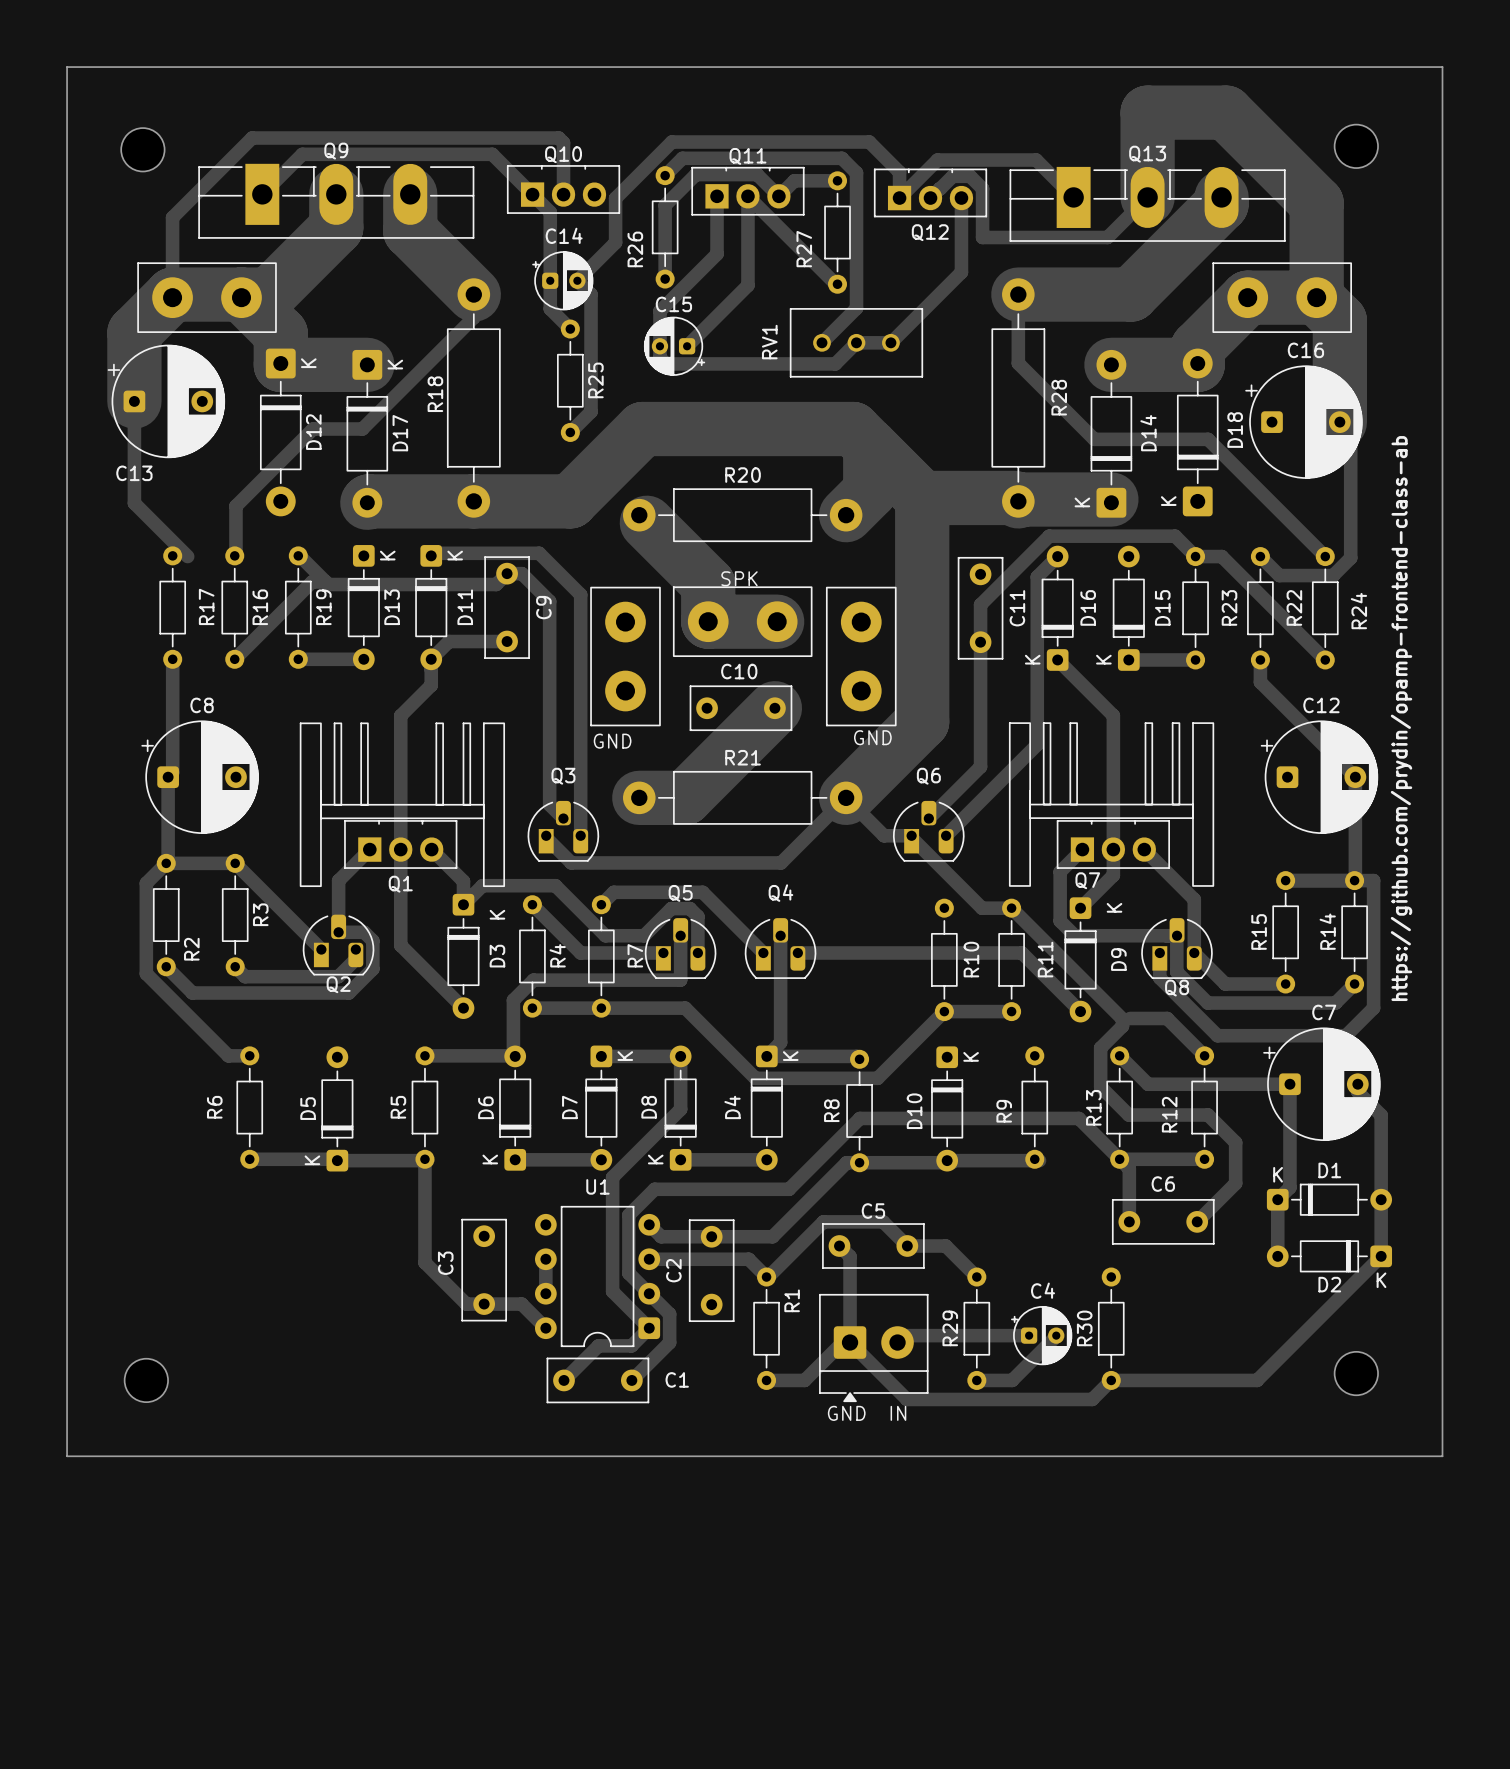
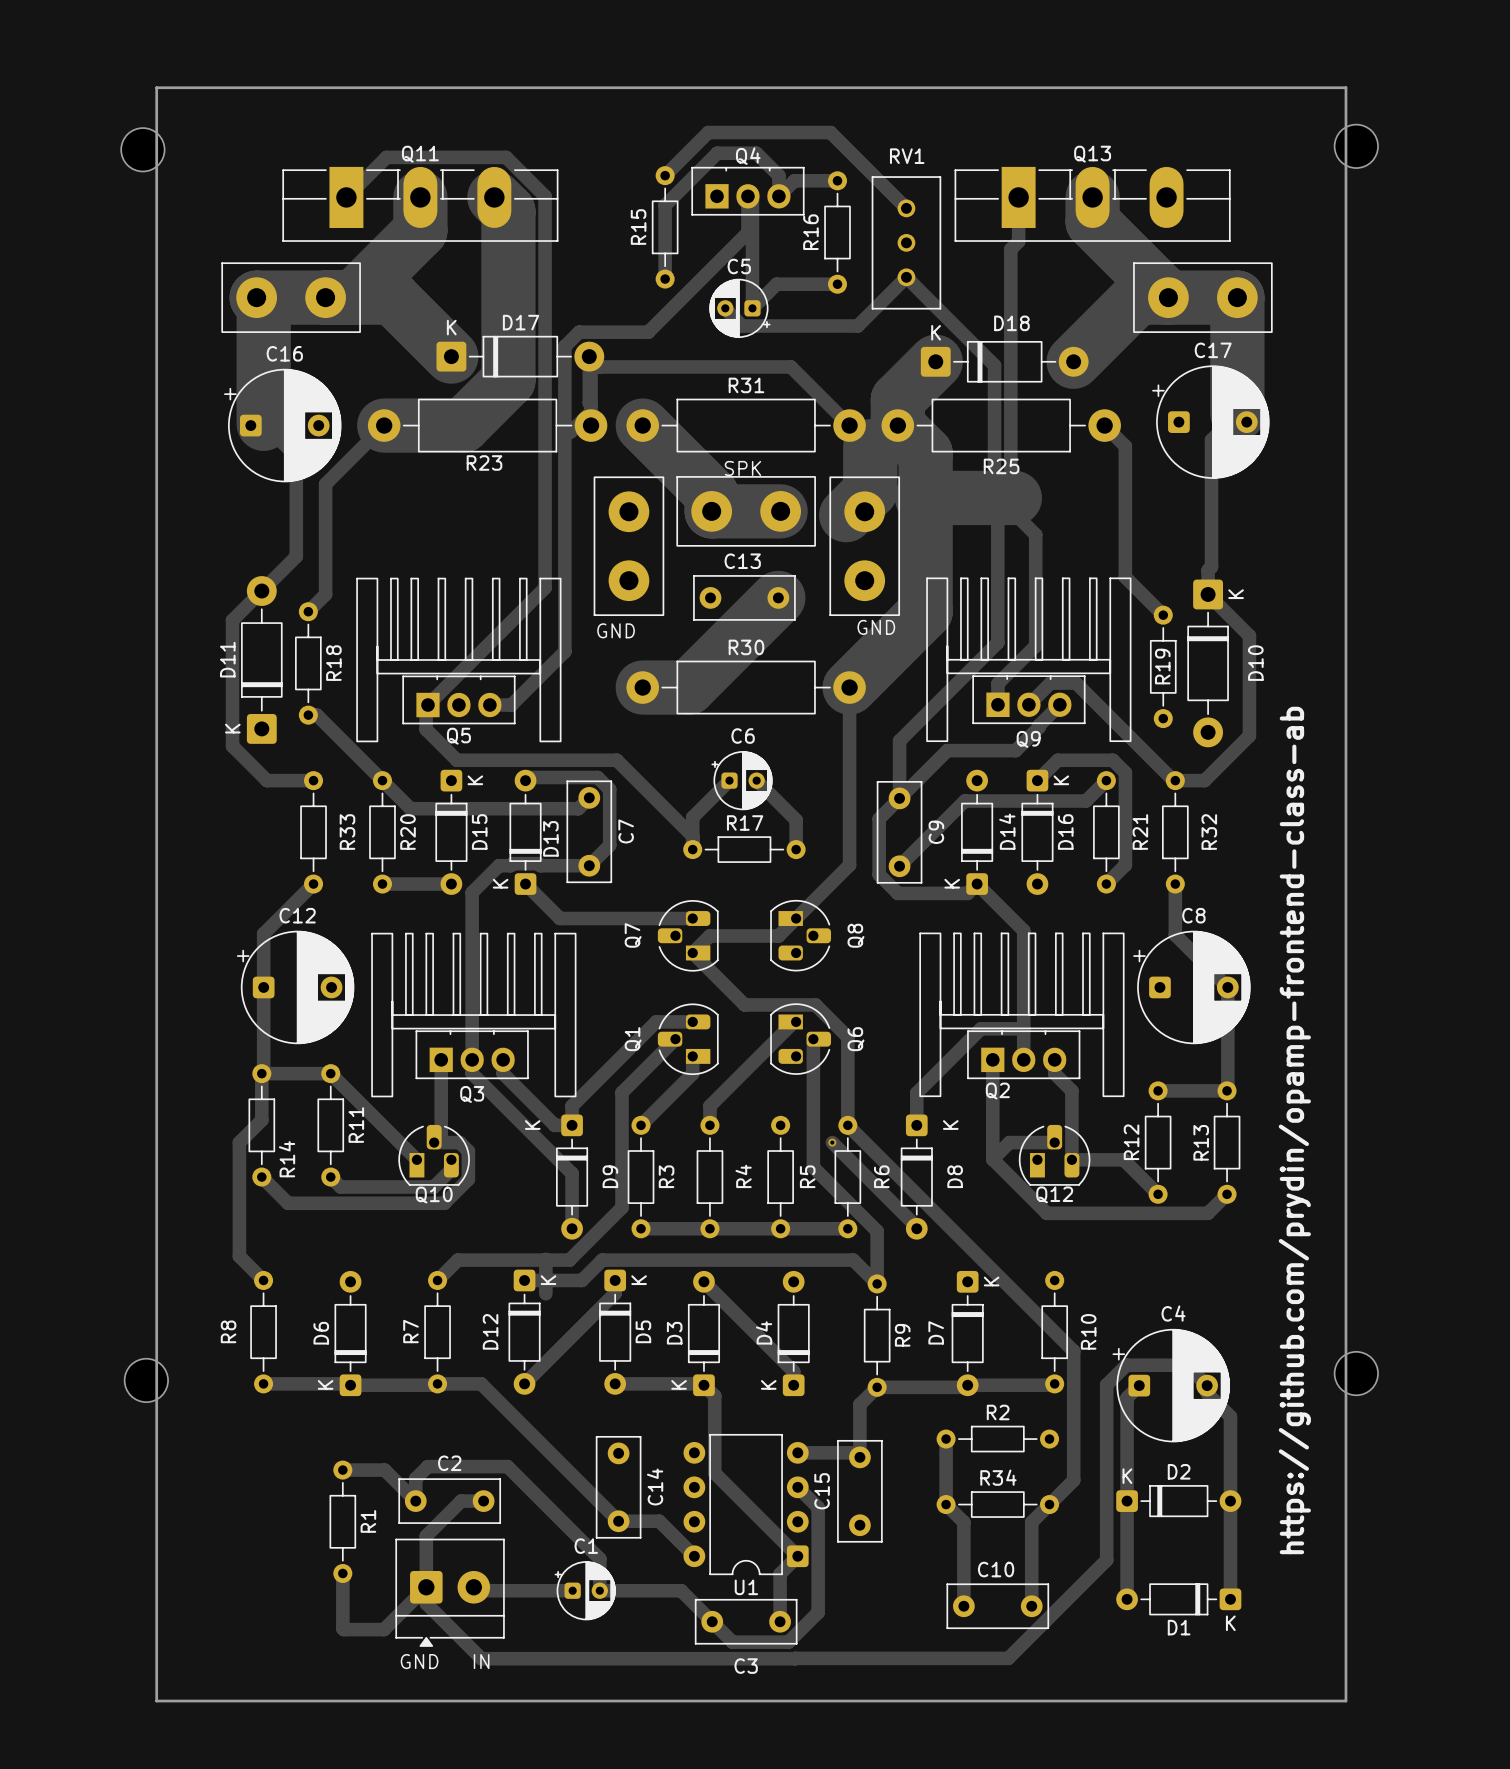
board edge: (67, 67) (1442, 67) (1442, 1456) (67, 1456) (67, 67) -> (156, 87) (156, 1701) (1345, 1701) (1345, 87) (156, 87)
Q9 name position: Q9 (336, 151) -> Q9 (1028, 739)
Q10 name position: Q10 (563, 154) -> Q10 (434, 1195)
Q11 name: Q11 (747, 156) -> Q4 (748, 156)
track: (682, 158) (841, 158) (856, 172) (856, 308) (821, 342) -> (682, 158) (708, 132) (830, 132) (906, 208)
Q9 footprint: [198, 163, 475, 239] -> [972, 675, 1086, 725]
Q10 footprint: [506, 165, 621, 214] -> [398, 1124, 470, 1186]
Q12 footprint: [873, 168, 988, 218] -> [1018, 1124, 1091, 1186]
track: (695, 174) (757, 174) (778, 196) -> (695, 174) (717, 153) (756, 153) (778, 175) (778, 196)
track: (262, 194) (302, 154) (492, 154) (550, 212) (550, 308) (570, 329) -> none
track: (336, 194) (336, 227) (269, 294) (172, 294) -> none
track: (410, 194) (410, 231) (473, 294) (473, 317) (362, 429) (313, 429) (235, 506) (235, 554) -> none
track: (563, 194) (563, 142) (558, 138) (252, 138) (172, 217) (172, 294) -> none
track: (717, 196) (717, 254) (659, 311) (659, 357) (666, 363) (835, 363) (856, 342) (890, 342) (961, 272) (961, 198) -> none
track: none -> (346, 197) (386, 157) (506, 157) (545, 196) (545, 587) (426, 706) (426, 729) (456, 760) (616, 760) (692, 836)
track: none -> (420, 197) (420, 230) (353, 297)
track: none -> (494, 197) (508, 211) (508, 380) (463, 425) (384, 425) (325, 484) (325, 594) (308, 611)
track: none -> (1018, 197) (1018, 241) (1010, 249) (1010, 509) (1035, 534) (1035, 645) (997, 683) (997, 704)
track: (1073, 197) (1036, 160) (937, 160) (899, 198) (899, 172) (869, 142) (671, 142) (615, 198) (615, 242) (577, 280) (591, 294) (591, 358) -> none
track: none -> (1092, 197) (1092, 221) (1168, 297)
track: (1221, 197) (1221, 204) (1131, 294) (1018, 294) (1018, 363) (1094, 439) (1208, 439) (1325, 556) -> none
track: (930, 198) (952, 176) (970, 176) (982, 188) (982, 237) (1107, 237) (1147, 197) (1147, 112) (1226, 112) (1316, 203) (1316, 297) -> none
track: (752, 200) (835, 284) -> (752, 200) (752, 308) (776, 284) (837, 284)
Q11: none -> (420, 204)
Q13 position: (1147, 204) -> (1092, 204)
track: (747, 232) (747, 285) (687, 346) -> (747, 232) (648, 332) (579, 332) (564, 346) (564, 651) (511, 705) (489, 705)
C14 name position: C14 (564, 235) -> C14 (655, 1486)
R26 name: R26 (635, 249) -> R15 (638, 227)
R27 name: R27 (804, 249) -> R16 (810, 232)
C14 footprint: [532, 251, 594, 311] -> [595, 1436, 642, 1539]
R18 footprint: [446, 278, 501, 518] -> [295, 602, 322, 725]
track: (172, 294) (134, 332) (134, 503) (187, 556) -> none
track: (241, 294) (280, 333) (280, 364) (367, 364) -> none
part position: (207, 297) -> (291, 297)
part position: (1282, 297) -> (1202, 297)
track: (1316, 297) (1247, 297) (1197, 347) (1197, 364) (1111, 364) -> none
track: (1316, 297) (1339, 320) (1339, 422) (1350, 432) (1350, 558) (1333, 575) (1279, 575) (1260, 556) -> none
C15 name position: C15 (673, 304) -> C15 (822, 1491)
track: none -> (725, 309) (742, 326) (857, 326) (906, 277) (994, 365) (994, 516) (997, 519) (997, 642) (899, 740) (899, 798)
C15 footprint: [643, 316, 706, 376] -> [837, 1440, 883, 1543]
R25 footprint: [557, 319, 584, 442] -> [881, 398, 1121, 453]
RV1 rotation: 0° (856, 342) -> 90° clockwise (906, 242)
RV1 position: (856, 342) -> (906, 242)
C13 footprint: [107, 344, 226, 459] -> [693, 575, 796, 621]
D12 footprint: [260, 348, 302, 517] -> [508, 1269, 541, 1395]
D14 footprint: [1090, 349, 1133, 518] -> [961, 769, 994, 895]
track: none -> (451, 356) (392, 297) (256, 297) (263, 304) (263, 423) (296, 456) (296, 556) (232, 620) (232, 746) (266, 780) (313, 780)
track: none -> (935, 361) (897, 399) (897, 425) (925, 453) (925, 611) (849, 687) (849, 865) (778, 936) (709, 936) (692, 952) (744, 1004) (815, 1004) (847, 1037) (847, 1125) (1073, 1351) (1073, 1480) (1031, 1522) (1031, 1606)
track: none -> (1073, 361) (1137, 297) (1237, 297) (1237, 414)
R25 name position: R25 (595, 380) -> R25 (1001, 466)
R18 name position: R18 (435, 394) -> R18 (333, 663)
R28: (1018, 397) -> none
track: none -> (591, 404) (589, 403) (589, 356) (599, 366) (790, 366) (849, 425)
C17: none -> (1210, 422)
C16 position: (1303, 422) -> (282, 425)
track: none -> (1227, 423) (1211, 440) (1211, 566) (1208, 570) (1208, 594) (1249, 635) (1249, 735) (1204, 780) (1175, 780)
track: none -> (642, 425) (711, 494) (711, 511) (780, 511)
R31: none -> (746, 425)
track: none -> (1104, 425) (1125, 446) (1125, 577) (1163, 615)
D18 name position: D18 (1235, 430) -> D18 (1011, 323)
D12 name position: D12 (313, 432) -> D12 (490, 1331)
D18 rotation: 0° (1197, 432) -> 90° clockwise (1004, 361)
D18 position: (1197, 432) -> (1004, 361)
D17 rotation: 0° (367, 433) -> 90° counterclockwise (520, 356)
D17 position: (367, 433) -> (520, 356)
C13 name position: C13 (134, 473) -> C13 (742, 561)
R20 name position: R20 (743, 475) -> R20 (408, 832)
R20 footprint: [623, 488, 863, 543] -> [369, 771, 396, 894]
track: (1111, 499) (1020, 499) (1018, 501) -> none
track: (367, 502) (570, 501) (642, 429) (853, 429) (922, 498) (922, 721) (846, 797) -> none
part: none -> (746, 511)
track: (646, 522) (708, 584) (708, 621) (777, 621) -> none
D11 footprint: [415, 545, 448, 671] -> [241, 576, 283, 744]
part: none -> (628, 546)
part: none -> (864, 546)
R23 footprint: [1182, 547, 1209, 670] -> [367, 398, 608, 453]
track: (433, 553) (539, 553) (580, 594) (580, 835) -> none
track: (300, 556) (328, 584) (496, 584) (507, 573) (521, 573) (549, 601) (549, 804) (563, 818) -> none
track: (1057, 556) (1037, 576) (1037, 744) (946, 835) -> none
drawing: none -> [356, 577, 562, 743]
drawing: none -> [926, 577, 1132, 742]
text position: SPK (739, 578) -> SPK (742, 468)
track: (325, 582) (312, 582) (234, 659) -> none
R17 name position: R17 (206, 606) -> R17 (745, 823)
R17 rotation: 0° (172, 607) -> 90° clockwise (744, 849)
R17 position: (172, 607) -> (744, 849)
R16: (234, 607) -> none
R19 position: (298, 607) -> (1163, 666)
R19 name position: R19 (323, 607) -> R19 (1162, 666)
D13 rotation: 0° (363, 607) -> 180° (525, 832)
D13 position: (363, 607) -> (525, 832)
D11 name position: D11 (465, 607) -> D11 (227, 659)
C9 position: (507, 607) -> (899, 832)
R23 name position: R23 (1229, 607) -> R23 (484, 462)
C11: (980, 608) -> none
D16 rotation: 0° (1057, 608) -> 180° (1037, 832)
D16 position: (1057, 608) -> (1037, 832)
D15 rotation: 0° (1128, 608) -> 180° (451, 832)
D15 position: (1128, 608) -> (451, 832)
R22: (1260, 608) -> none
R24: (1325, 608) -> none
part: (742, 621) -> none
track: (507, 641) (449, 641) (431, 659) (431, 685) (400, 715) (400, 945) (463, 1008) -> none
part: (625, 656) -> none
part: (861, 656) -> none
track: (172, 659) (172, 772) (168, 777) (168, 861) -> none
track: (298, 659) (363, 659) -> none
track: (1057, 659) (1113, 715) (1113, 875) (1080, 908) -> none
track: (1128, 659) (1195, 659) -> none
track: (1260, 659) (1260, 682) (1355, 777) (1355, 879) -> none
track: (1325, 659) (1221, 556) (1195, 556) (1175, 536) (1049, 536) (980, 604) (980, 766) (928, 818) -> none
track: none -> (1028, 704) (1050, 683) (1076, 683) (1173, 780)
track: none -> (1059, 704) (1015, 750) (947, 750) (879, 818) (879, 874) (897, 893) (967, 893) (977, 884) (1023, 930) (1023, 1059)
C10 position: (740, 708) -> (997, 1606)
track: (774, 708) (685, 797) (639, 797) -> (778, 597) (688, 687) (642, 687)
track: none -> (308, 715) (316, 715) (410, 808) (578, 808) (589, 797)
text: https://github.com/prydin/opamp-frontend-class-ab (1401, 718) -> none
drawing: [299, 722, 505, 887] -> none
drawing: [1009, 722, 1215, 887] -> none
text position: GND (872, 737) -> GND (876, 627)
text position: GND (612, 741) -> GND (616, 630)
R21 name position: R21 (743, 757) -> R21 (1140, 832)
R21 footprint: [623, 770, 863, 825] -> [1093, 771, 1120, 894]
Q3 name position: Q3 (563, 776) -> Q3 (472, 1094)
C8 position: (200, 777) -> (1191, 987)
C12 position: (1319, 777) -> (295, 987)
track: none -> (525, 780) (528, 777) (597, 777) (609, 789) (609, 845) (589, 865) (540, 865) (538, 863) (499, 865) (472, 892) (472, 1073) (572, 1173) (572, 1228)
track: none -> (729, 780) (692, 817) (692, 849)
track: none -> (756, 780) (796, 820) (796, 849)
track: none -> (1037, 780) (1057, 760) (1112, 760) (1125, 772) (1125, 865) (1106, 884)
track: none -> (1106, 780) (1086, 801) (964, 801) (899, 866)
track: (846, 797) (781, 862) (571, 862) (546, 837) -> none
track: (846, 797) (884, 835) (911, 835) -> none
Q3 footprint: [527, 800, 600, 862] -> [415, 1030, 529, 1080]
Q1 footprint: [344, 820, 458, 869] -> [657, 1003, 719, 1076]
Q7 footprint: [1056, 820, 1170, 869] -> [657, 900, 719, 972]
Q6 rotation: 0° (928, 831) -> 90° clockwise (800, 1039)
Q6 position: (928, 831) -> (800, 1039)
R33: none -> (313, 832)
R32: none -> (1175, 832)
track: (911, 837) (982, 908) (1011, 908) (1122, 1019) (1122, 1026) (1100, 1047) (1100, 1086) (1128, 1115) (1208, 1115) (1235, 1142) (1235, 1183) (1197, 1221) -> none
track: (369, 849) (338, 880) (338, 932) (364, 932) (372, 940) (372, 969) (348, 993) (192, 993) (166, 966) -> none
track: (431, 849) (463, 881) (463, 904) (482, 885) (555, 885) (605, 935) (644, 935) (671, 908) (689, 908) (697, 916) (697, 952) -> none
track: (1082, 849) (1060, 871) (1060, 921) (1074, 935) (1177, 935) -> none
track: (1144, 849) (1194, 899) (1194, 952) (1225, 984) (1285, 984) -> none
Q7 name position: Q7 (1087, 880) -> Q7 (633, 935)
track: (1285, 880) (1373, 880) (1373, 1008) (1345, 1035) (1217, 1035) (1159, 978) (1159, 952) -> none
track: none -> (313, 884) (263, 933) (263, 1071)
track: none -> (382, 884) (451, 884)
Q1 name position: Q1 (400, 884) -> Q1 (633, 1039)
track: none -> (525, 884) (560, 918) (692, 918)
track: none -> (1175, 884) (1175, 934) (1227, 987) (1227, 1090)
D3 footprint: [447, 893, 480, 1020] -> [687, 1270, 720, 1397]
Q5 name position: Q5 (680, 893) -> Q5 (458, 736)
track: (532, 904) (580, 952) (663, 952) -> none
track: (601, 904) (613, 892) (702, 892) (763, 952) -> none
D9 text position: K (1114, 907) -> K (532, 1125)
Q2 footprint: [302, 914, 375, 976] -> [967, 1030, 1081, 1080]
R2 rotation: 0° (166, 915) -> 90° clockwise (997, 1439)
R2 position: (166, 915) -> (997, 1439)
R3 position: (235, 915) -> (641, 1177)
Q5 footprint: [644, 918, 717, 979] -> [402, 675, 516, 725]
R14 name position: R14 (1327, 931) -> R14 (287, 1159)
drawing: none -> [371, 932, 577, 1098]
drawing: none -> [919, 932, 1125, 1097]
R15: (1285, 932) -> none
R14 position: (1354, 932) -> (261, 1125)
track: (680, 935) (680, 980) (533, 980) (513, 1000) (513, 1054) (515, 1056) -> none
track: (780, 935) (780, 1042) (766, 1056) (856, 1056) (859, 1059) -> none
track: (1175, 935) (1176, 971) (1207, 1003) (1335, 1003) (1354, 984) -> none
Q4: (780, 948) -> none
Q8 rotation: 0° (1176, 948) -> 90° clockwise (800, 935)
Q8 position: (1176, 948) -> (800, 935)
R2 name position: R2 (191, 949) -> R2 (998, 1412)
track: (321, 949) (235, 863) (166, 863) (146, 883) (146, 973) (228, 1055) (249, 1055) -> none
track: (797, 952) (1021, 952) (1080, 1011) -> none
R4 name position: R4 (557, 955) -> R4 (743, 1176)
R7 name position: R7 (635, 955) -> R7 (410, 1331)
D3 name position: D3 (497, 956) -> D3 (674, 1333)
R4 position: (532, 956) -> (709, 1177)
R7 position: (601, 956) -> (437, 1332)
track: (355, 959) (338, 976) (245, 976) (235, 966) -> (451, 1169) (433, 1186) (340, 1186) (330, 1177)
R10 position: (944, 959) -> (1054, 1332)
R10 name position: R10 (971, 959) -> R10 (1088, 1331)
R11 position: (1011, 959) -> (330, 1125)
R11 name position: R11 (1045, 959) -> R11 (356, 1125)
D9 position: (1080, 959) -> (572, 1177)
Q8 name position: Q8 (1177, 988) -> Q8 (855, 935)
track: (532, 1008) (685, 1008) (755, 1078) (877, 1078) (944, 1011) (1011, 1011) -> none
C7 name position: C7 (1324, 1012) -> C7 (626, 831)
track: (1130, 1018) (1167, 1018) (1204, 1055) -> none
track: none -> (692, 1021) (656, 1021) (572, 1106) (572, 1125) (554, 1125) (503, 1073) (503, 1056)
track: none -> (794, 1021) (709, 1106) (709, 1125)
C7 footprint: [1263, 1027, 1381, 1141] -> [566, 780, 613, 884]
track: none -> (1023, 1028) (980, 1028) (916, 1093) (916, 1125)
track: none -> (675, 1039) (622, 1092) (622, 1207) (569, 1260) (457, 1260) (437, 1280)
track: none -> (813, 1039) (813, 1167) (877, 1231) (877, 1283) (853, 1260) (602, 1260) (581, 1280) (524, 1280)
D8 footprint: [664, 1045, 697, 1171] -> [900, 1114, 933, 1240]
D10 footprint: [931, 1046, 964, 1172] -> [1187, 579, 1229, 748]
track: (424, 1055) (514, 1055) -> none
track: (1119, 1055) (1148, 1084) (1289, 1084) (1289, 1187) (1277, 1199) (1277, 1256) -> none
track: none -> (441, 1056) (441, 1135) (434, 1142) (459, 1142) (468, 1151) (468, 1179) (444, 1203) (288, 1203) (261, 1177)
track: (601, 1056) (680, 1056) (680, 1109) (612, 1177) (612, 1291) (649, 1328) (631, 1345) (598, 1345) (563, 1380) -> none
track: none -> (692, 1056) (692, 1073) (641, 1125)
track: none -> (992, 1059) (992, 1159)
track: none -> (1054, 1059) (1054, 1073) (1071, 1090) (1071, 1159) (1123, 1159) (1158, 1194)
track: (1357, 1084) (1357, 1091) (1381, 1115) (1381, 1256) (1257, 1380) (1111, 1380) (1092, 1399) (906, 1399) (850, 1342) (850, 1256) (839, 1246) -> none
track: none -> (1158, 1090) (1227, 1090)
R6 name position: R6 (214, 1107) -> R6 (881, 1176)
R6 position: (249, 1107) -> (847, 1177)
R5 name position: R5 (398, 1107) -> R5 (807, 1176)
R5 position: (424, 1107) -> (780, 1177)
D8 name position: D8 (649, 1107) -> D8 (955, 1176)
R9 position: (1034, 1107) -> (877, 1335)
R13 position: (1119, 1107) -> (1227, 1142)
R12 position: (1204, 1107) -> (1158, 1142)
D5 rotation: 0° (337, 1108) -> 180° (615, 1332)
D5 position: (337, 1108) -> (615, 1332)
D6 position: (515, 1108) -> (350, 1333)
D7 position: (601, 1108) -> (967, 1333)
D4 rotation: 0° (766, 1108) -> 180° (793, 1333)
D4 position: (766, 1108) -> (793, 1333)
R8 name position: R8 (831, 1110) -> R8 (228, 1331)
R8 position: (859, 1111) -> (263, 1332)
D10 name position: D10 (914, 1111) -> D10 (1255, 663)
R9 name position: R9 (1004, 1111) -> R9 (902, 1335)
R12 name position: R12 (1169, 1114) -> R12 (1131, 1142)
text: none -> https://github.com/prydin/opamp-frontend-class-ab (1294, 1130)
track: none -> (832, 1142) (916, 1227)
via: none -> (832, 1142)
track: none -> (1054, 1142) (1009, 1142) (992, 1159)
track: (249, 1159) (335, 1159) -> (263, 1383) (349, 1383)
track: none -> (416, 1159) (330, 1073) (261, 1073) (261, 1120) (239, 1142) (239, 1256) (263, 1280)
track: (424, 1159) (424, 1262) (466, 1304) (521, 1304) (545, 1328) -> none
track: (515, 1159) (601, 1159) -> none
track: (680, 1159) (766, 1159) -> none
track: none -> (992, 1159) (1046, 1213) (1208, 1213) (1227, 1194)
track: (1119, 1159) (1204, 1159) -> none
track: (336, 1160) (427, 1160) -> (350, 1385) (441, 1385)
track: (953, 1160) (1039, 1160) -> (967, 1385) (1053, 1385)
track: (859, 1162) (846, 1162) (772, 1236) (661, 1236) (649, 1224) -> none
track: (863, 1162) (951, 1162) -> none
U1 name position: U1 (597, 1186) -> U1 (746, 1587)
C6 footprint: [1111, 1199, 1215, 1245] -> [711, 751, 773, 811]
D1 rotation: 0° (1329, 1199) -> 180° (1178, 1599)
D1 position: (1329, 1199) -> (1178, 1599)
track: (1129, 1221) (1129, 1168) (1078, 1118) (859, 1118) (789, 1189) (654, 1189) (628, 1215) (628, 1273) (669, 1314) (669, 1342) (631, 1380) -> none
C5 footprint: [822, 1223, 925, 1269] -> [709, 278, 771, 338]
track: none -> (641, 1228) (847, 1228)
D2 rotation: 0° (1329, 1256) -> 180° (1178, 1501)
D2 position: (1329, 1256) -> (1178, 1501)
track: (649, 1259) (748, 1259) (766, 1277) -> none
C3 name position: C3 (445, 1263) -> C3 (746, 1666)
R30 footprint: [1097, 1267, 1125, 1390] -> [626, 660, 866, 715]
C3 rotation: 0° (484, 1270) -> 90° clockwise (746, 1621)
C3 position: (484, 1270) -> (746, 1621)
C2 rotation: 0° (711, 1270) -> 90° clockwise (449, 1501)
C2 position: (711, 1270) -> (449, 1501)
U1 position: (597, 1276) -> (746, 1504)
track: (768, 1277) (823, 1221) (883, 1221) (907, 1246) (945, 1246) (976, 1277) -> none
track: none -> (615, 1280) (615, 1293) (524, 1383)
track: none -> (703, 1281) (793, 1371) (793, 1385)
C4 name position: C4 (1043, 1290) -> C4 (1173, 1313)
R1 name position: R1 (792, 1300) -> R1 (368, 1521)
C4 footprint: [1011, 1306, 1073, 1366] -> [1112, 1328, 1230, 1443]
R1 position: (766, 1328) -> (342, 1521)
R29: (976, 1328) -> none
R30 name position: R30 (1084, 1328) -> R30 (746, 647)
track: (1029, 1335) (904, 1335) (897, 1342) -> none
track: (1056, 1336) (1012, 1380) (976, 1380) -> none
track: (842, 1342) (804, 1380) (766, 1380) -> none
part: (873, 1348) -> none
C1 footprint: [546, 1357, 650, 1404] -> [554, 1561, 616, 1621]
C1 name position: C1 (677, 1379) -> C1 (586, 1546)
track: none -> (437, 1383) (481, 1383) (618, 1521) (659, 1521) (694, 1556)
track: none -> (615, 1383) (702, 1383)
track: none -> (703, 1385) (714, 1396) (714, 1473) (797, 1556) (780, 1573) (780, 1621)
track: none -> (1139, 1385) (1127, 1397) (1127, 1599)
track: none -> (965, 1387) (877, 1387) (859, 1404) (859, 1457) (855, 1452) (797, 1452)
text: GND (846, 1413) -> none
text: IN (898, 1413) -> none
track: none -> (946, 1439) (946, 1504) (963, 1522) (963, 1606)
track: none -> (342, 1470) (384, 1470) (415, 1501) (415, 1478) (427, 1466) (507, 1466) (599, 1558) (599, 1590) (681, 1590) (732, 1642) (788, 1642) (818, 1612) (818, 1507) (797, 1487)
track: none -> (483, 1501) (461, 1501) (426, 1535) (426, 1603) (481, 1658) (1008, 1658) (1106, 1560) (1106, 1384) (1126, 1365) (1186, 1365) (1207, 1385) (1207, 1393) (1230, 1416) (1230, 1599)
R34: none -> (997, 1504)
track: none -> (342, 1573) (343, 1629) (384, 1629) (426, 1587)
track: none -> (477, 1590) (572, 1590)
part: none -> (450, 1592)
text: none -> GND (419, 1661)
text: none -> IN (481, 1661)

